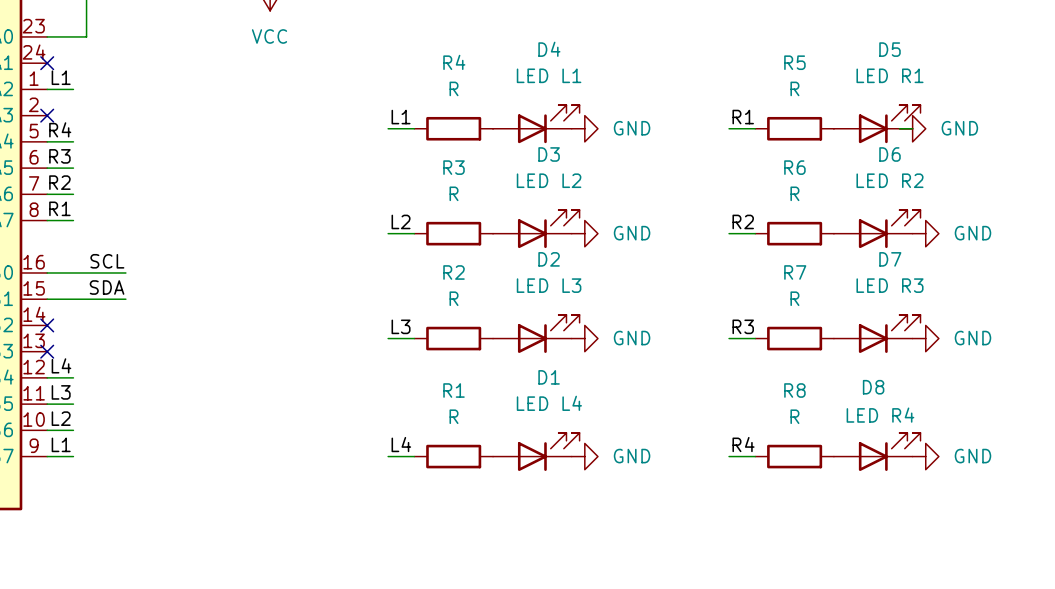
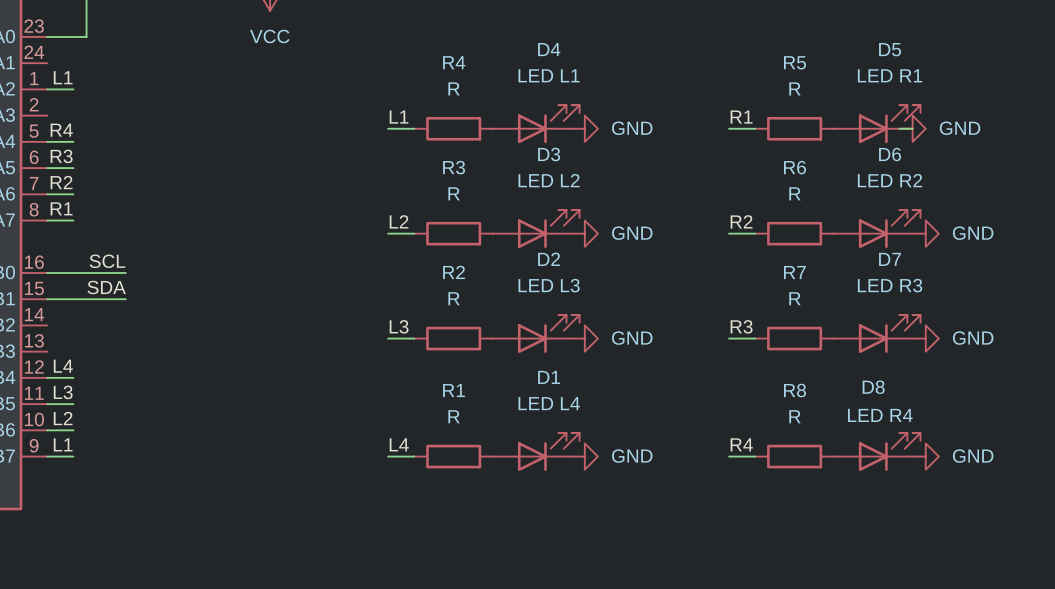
no-connect mark: (47, 63) -> none
no-connect mark: (47, 115) -> none
no-connect mark: (47, 325) -> none
no-connect mark: (47, 351) -> none

